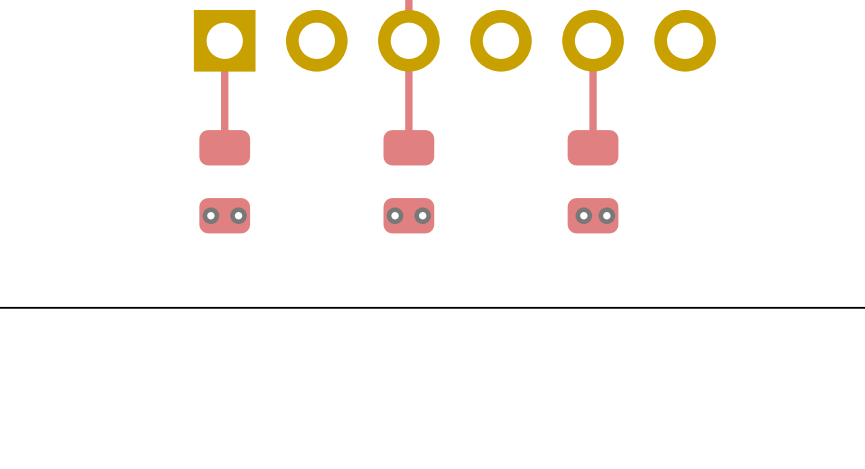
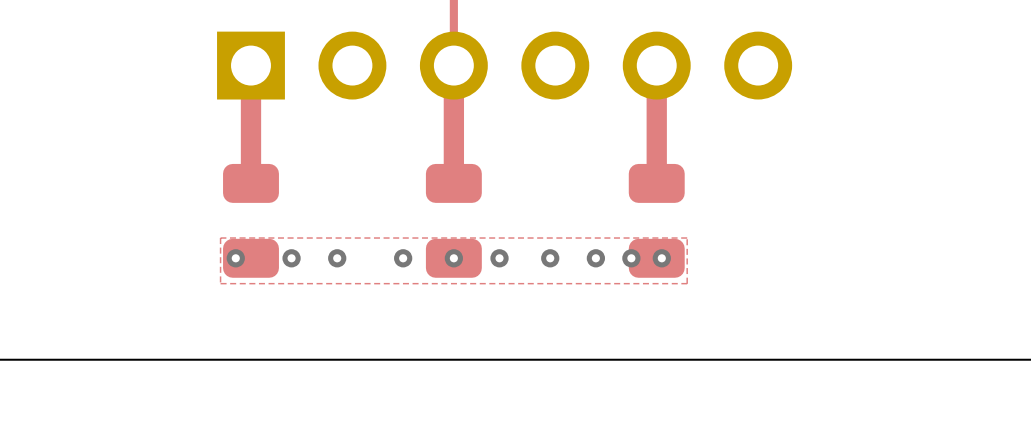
top track width: thin (224, 40) (224, 147) -> thick (250, 65) (250, 183)
top track width: thin (408, 40) (408, 147) -> thick (453, 65) (453, 183)
top track width: thin (593, 40) (593, 147) -> thick (656, 65) (656, 183)
top zone outline: none -> (687, 238) (687, 283) (220, 283) (220, 238) (687, 238)
via position: (238, 215) -> (291, 258)
via: none -> (337, 258)
via: none -> (403, 258)
via: (395, 215) -> none
via: none -> (453, 258)
via: (422, 215) -> none
via: none -> (499, 258)
via: none -> (550, 258)
via: none -> (595, 258)
via: none -> (631, 258)
via: (583, 215) -> none
via: none -> (661, 258)
via: (606, 215) -> none

